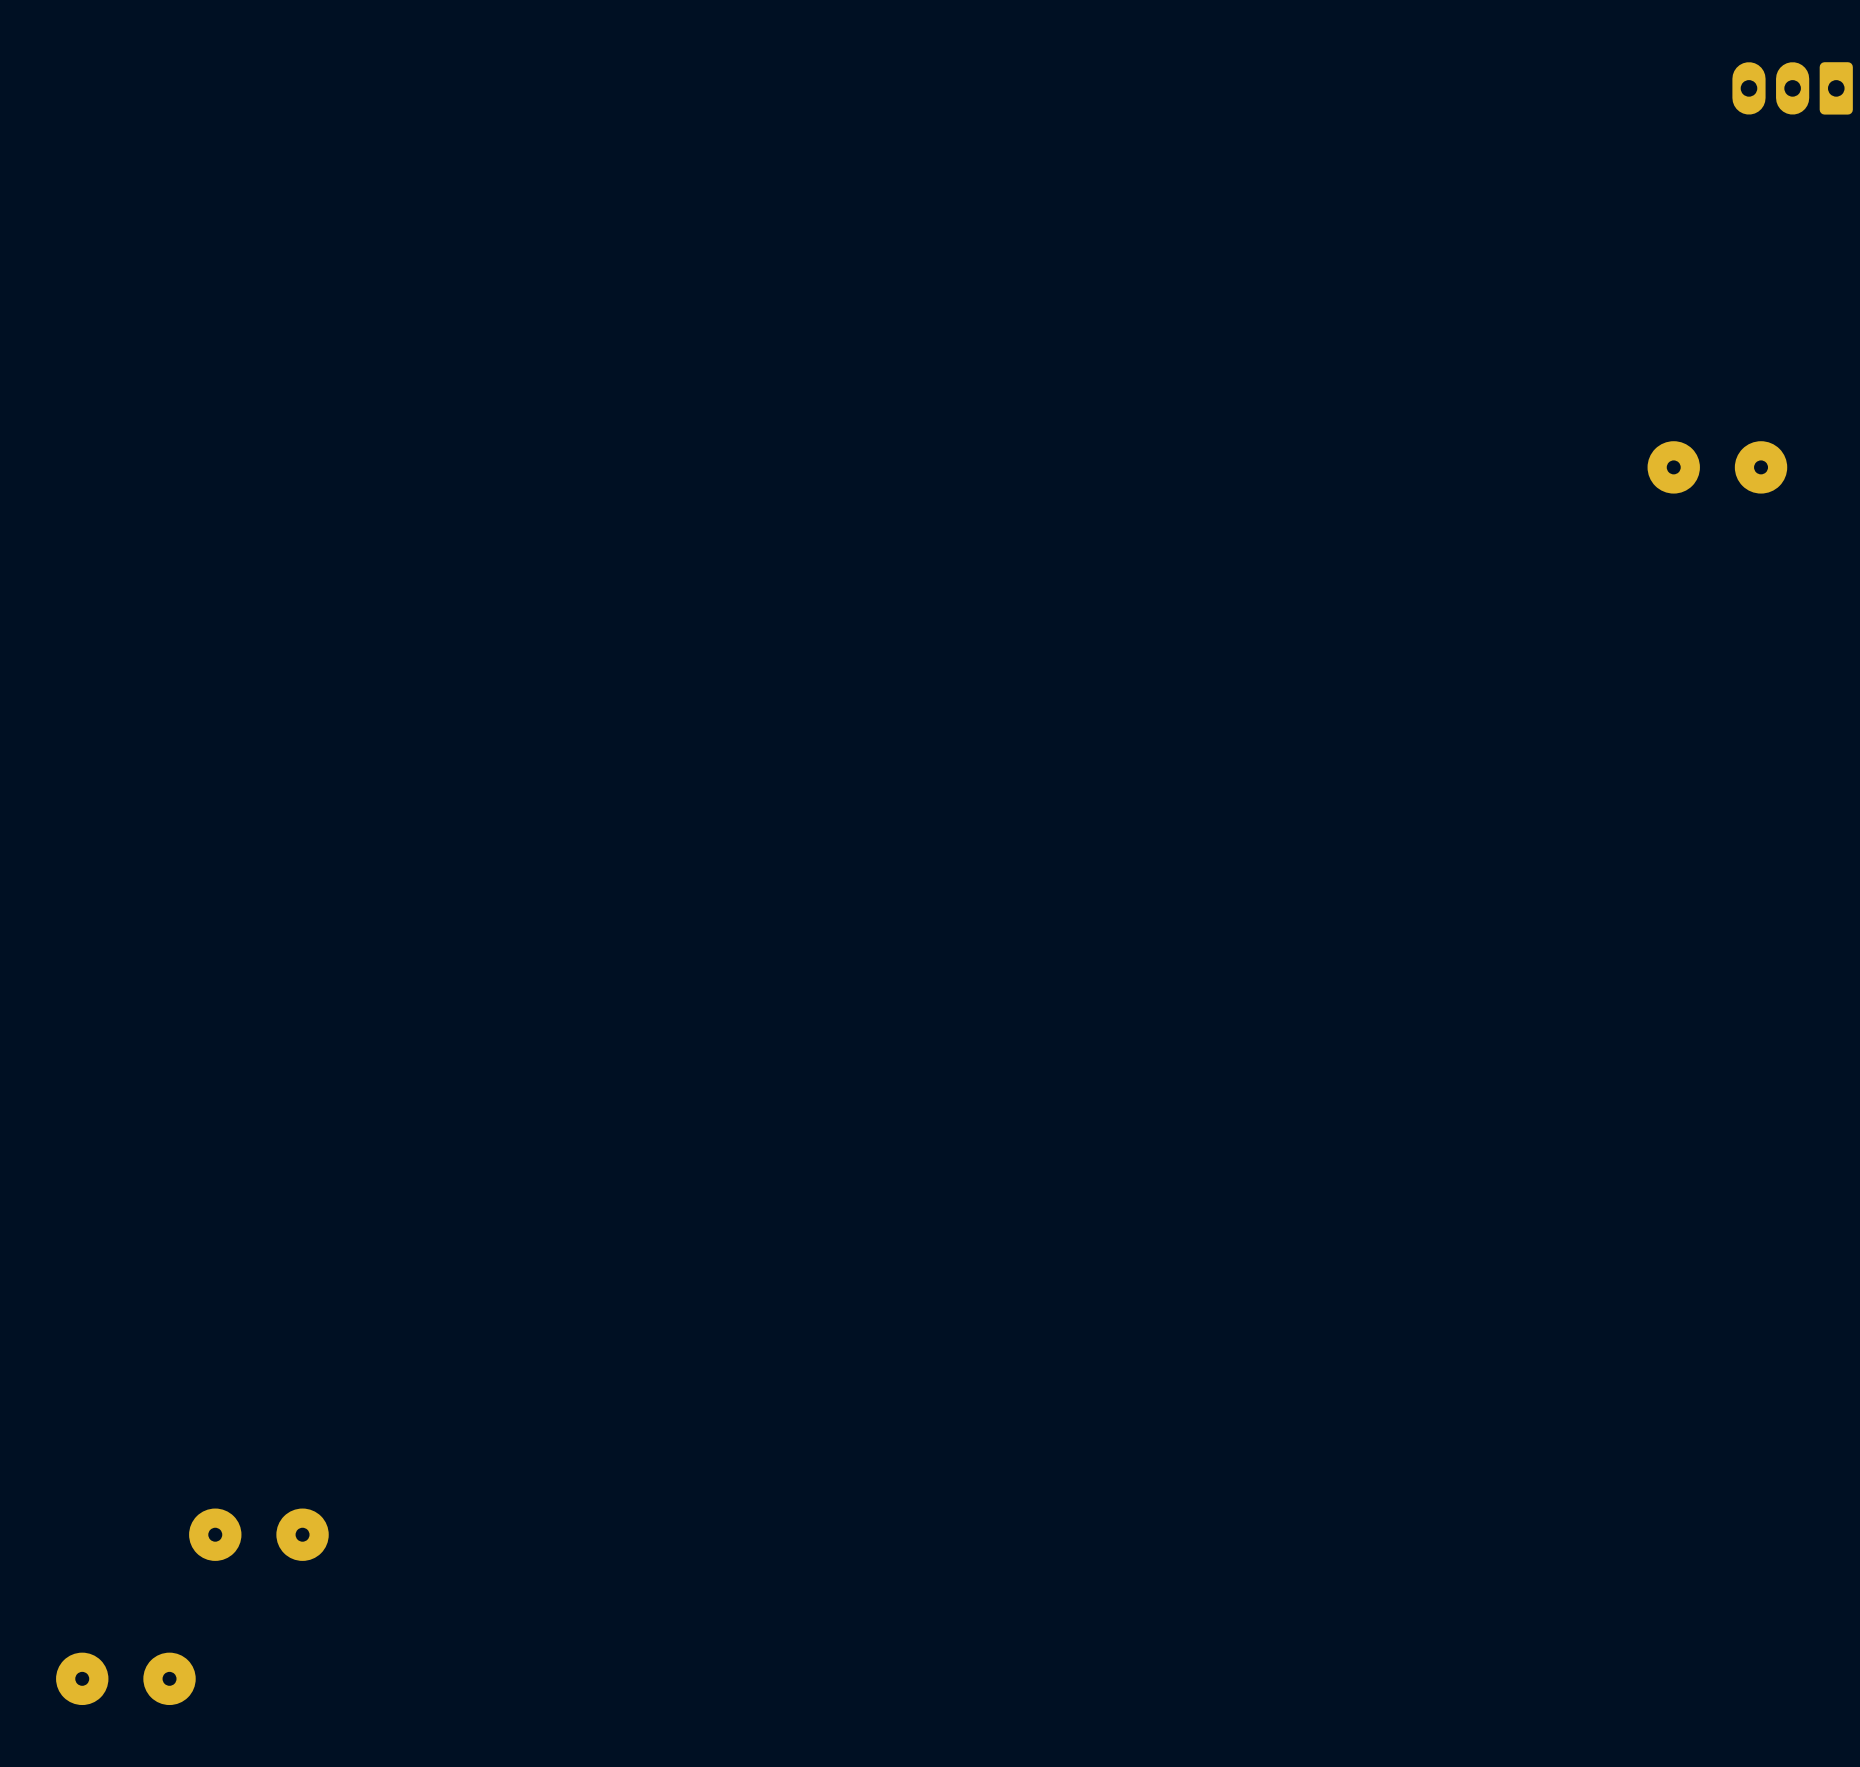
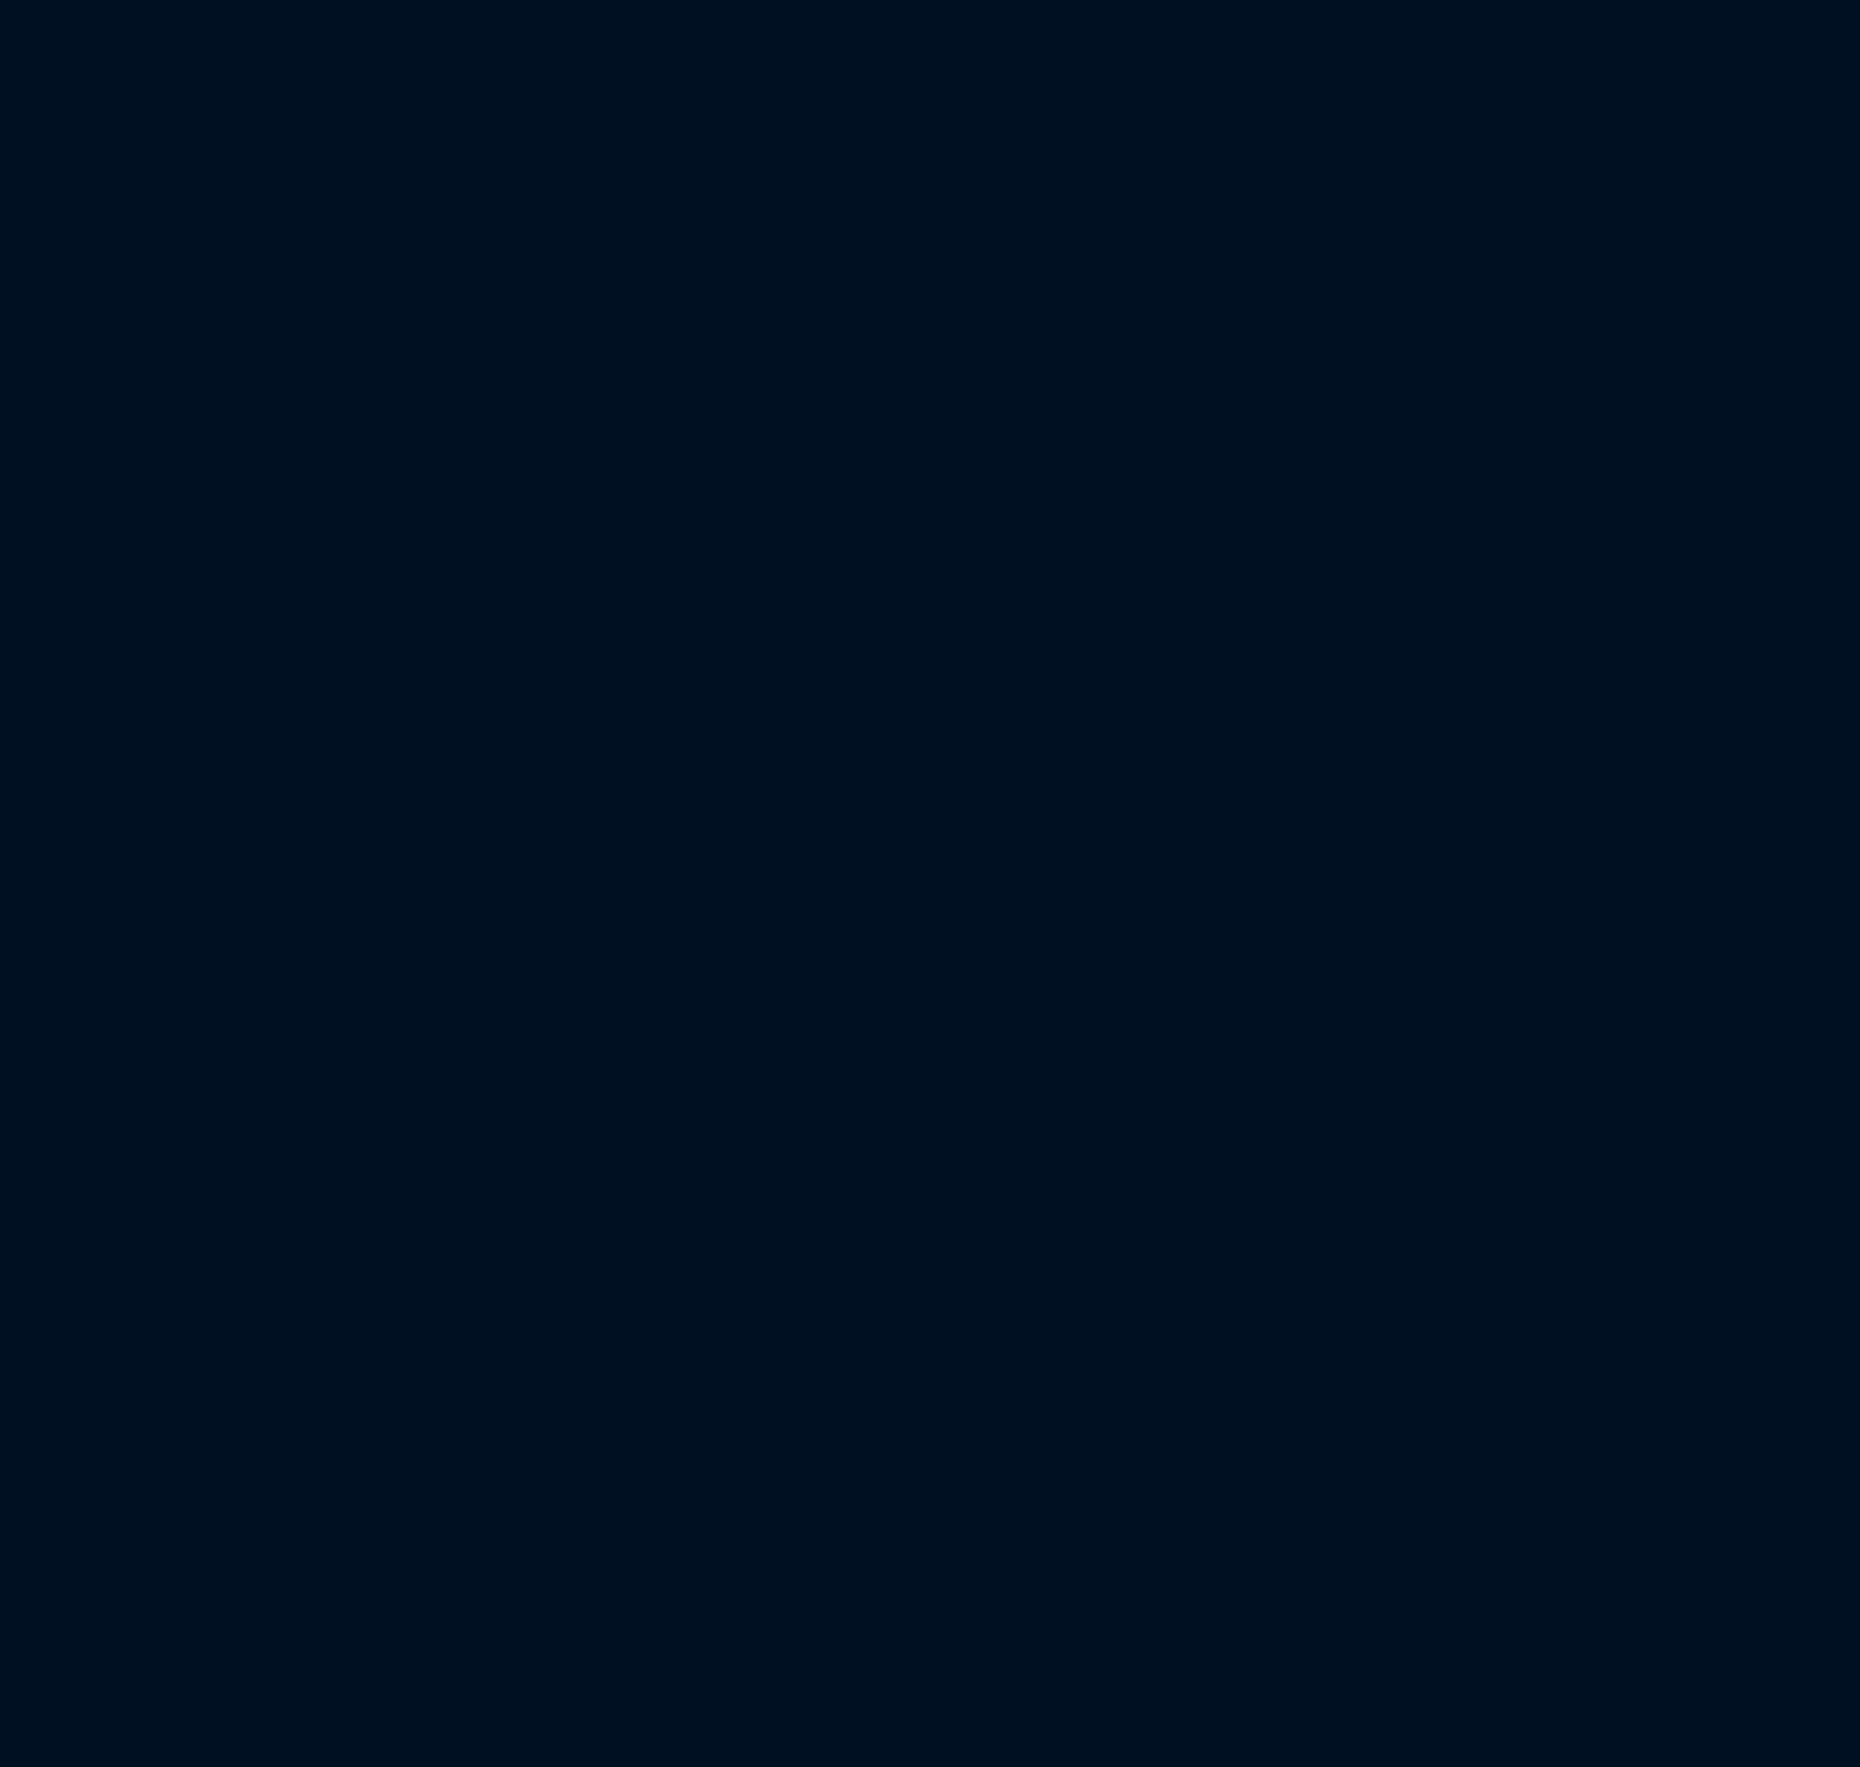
part: (1792, 88) -> none
part: (1717, 467) -> none
part: (258, 1534) -> none
part: (125, 1678) -> none

